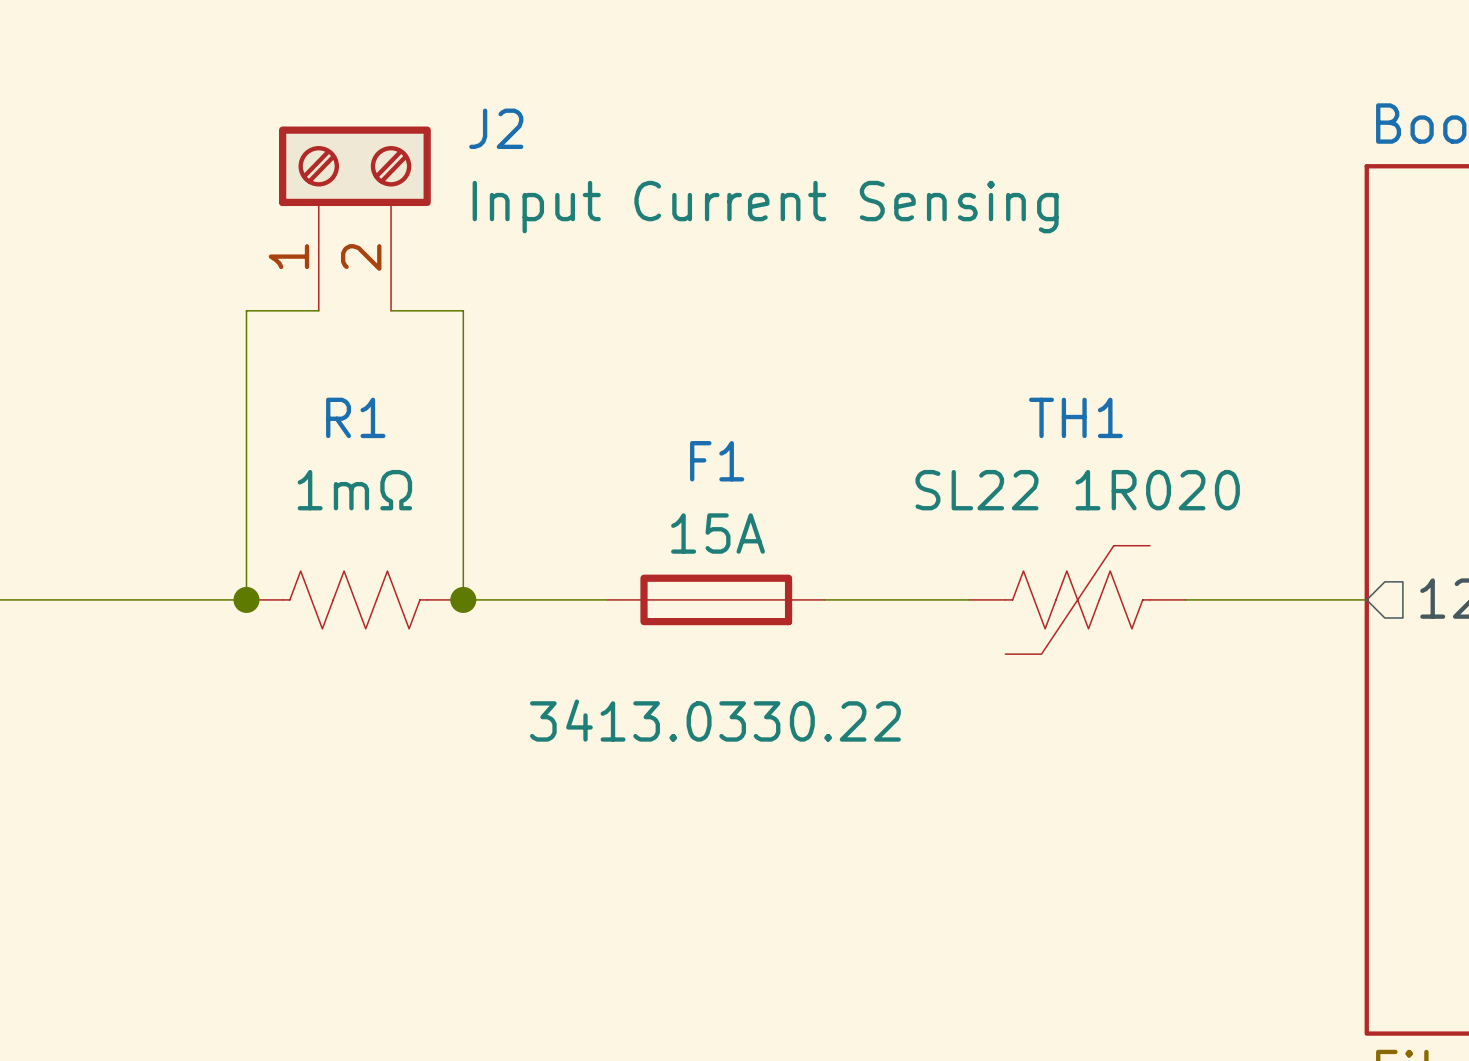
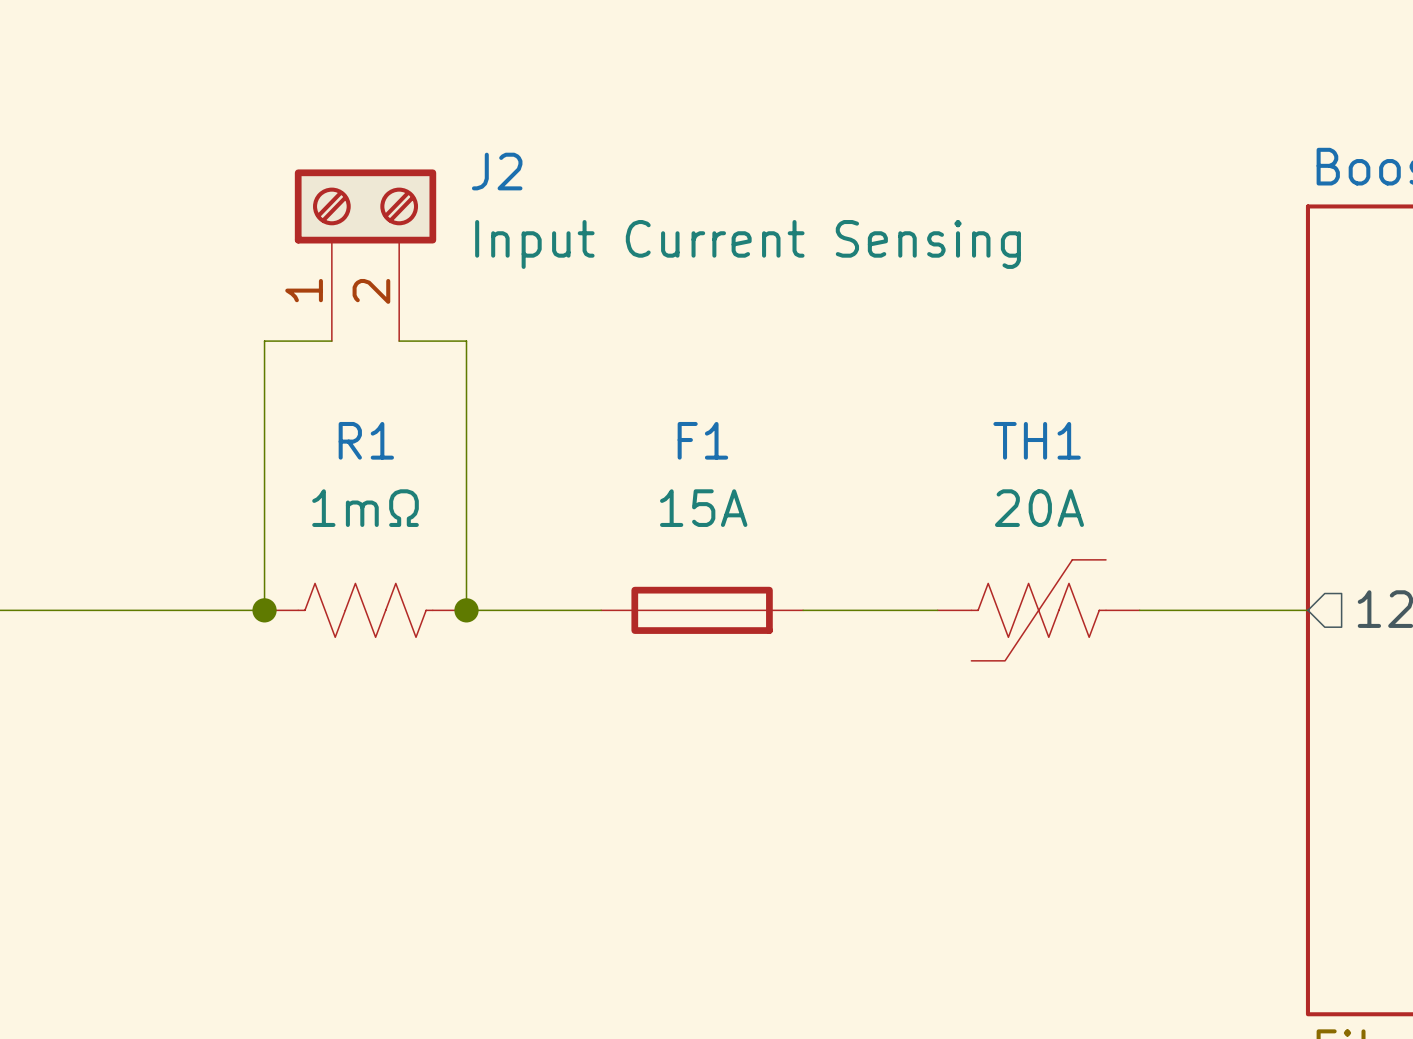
F1 name position: F1 (717, 461) -> F1 (702, 440)
TH1 text: SL22 1R020 (1077, 490) -> none
TH1 value: none -> 20A (1039, 508)
F1 value position: 15A (718, 533) -> 15A (703, 508)
F1 text: 3413.0330.22 (715, 720) -> none

